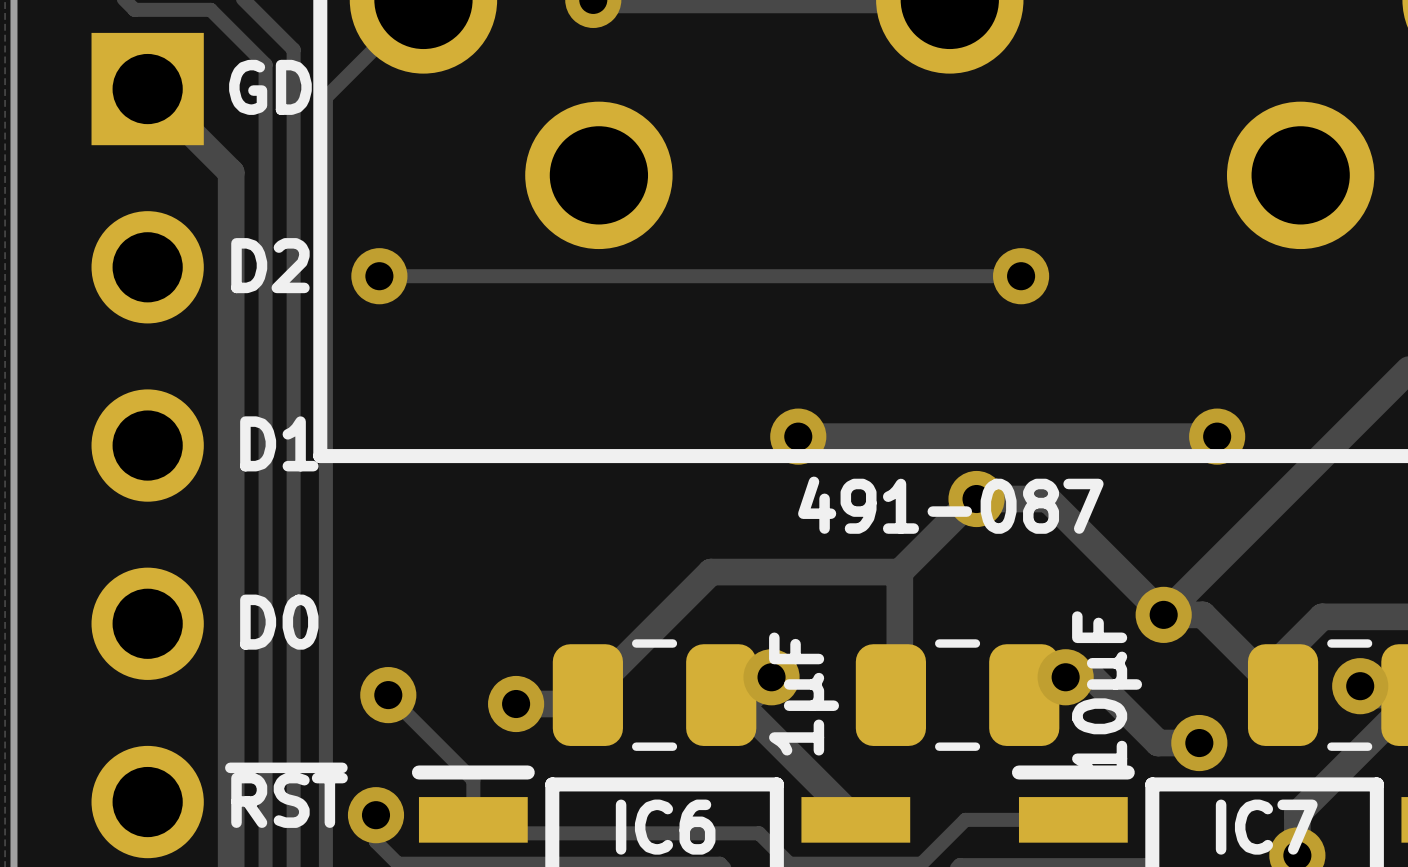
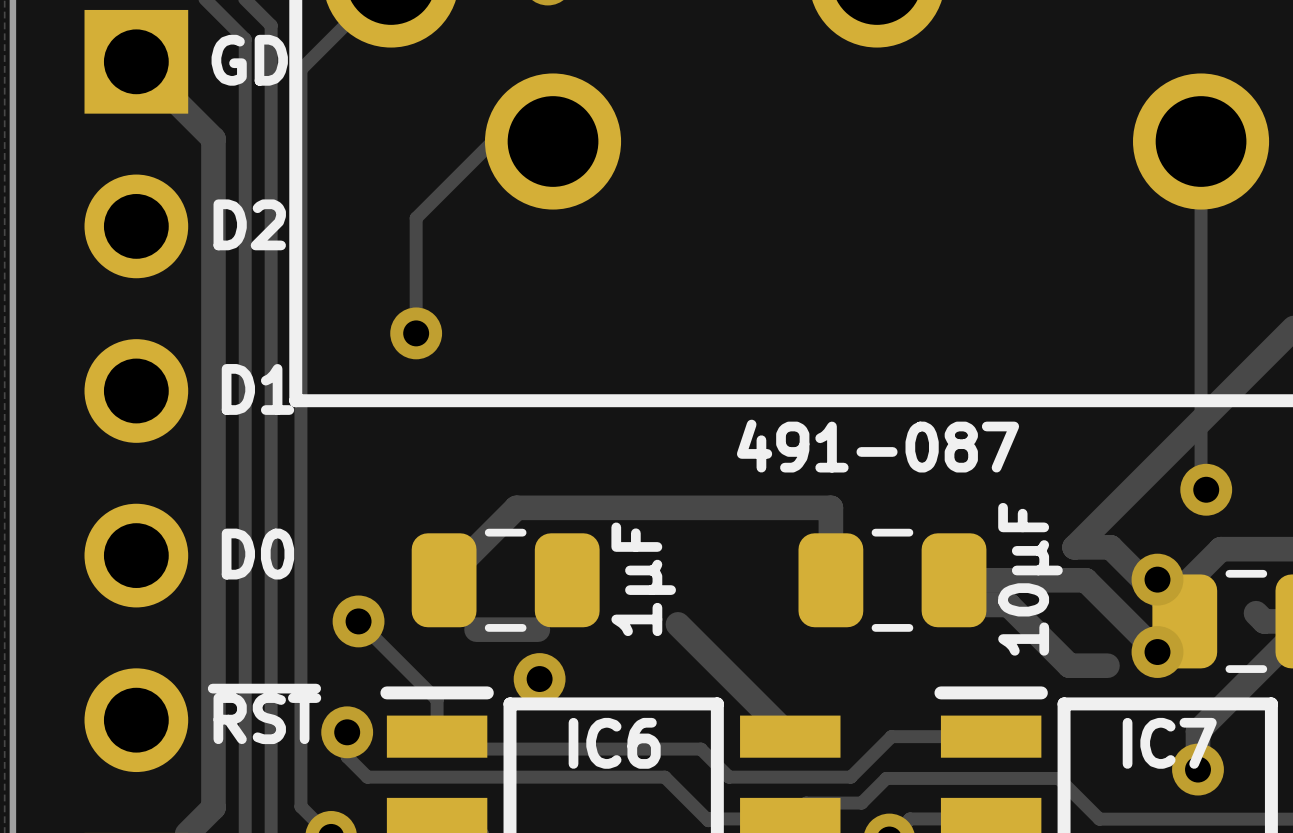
track: none -> (492, 141) (416, 218) (416, 333)
track: none -> (1201, 141) (1201, 484) (1206, 489)
track: (379, 276) (1021, 276) -> none
via position: (379, 276) -> (416, 333)
via: (1021, 276) -> none
track: (798, 436) (1217, 436) -> none
via: (798, 436) -> none
via: (1217, 436) -> none
via: (976, 499) -> none
via: none -> (1206, 489)
track: (710, 572) (587, 695) -> (656, 507) (516, 507) (444, 580)
track: (899, 572) (972, 499) (1047, 499) (1163, 614) -> none
via: (1163, 614) -> none
via: none -> (1157, 579)
track: none -> (954, 580) (1085, 580) (1157, 652)
via: (771, 677) -> none
via: (1065, 677) -> none
via: (1360, 686) -> none
part position: (654, 695) -> (505, 580)
part position: (957, 695) -> (892, 580)
via position: (516, 704) -> (539, 679)
via position: (1199, 743) -> (1157, 652)

